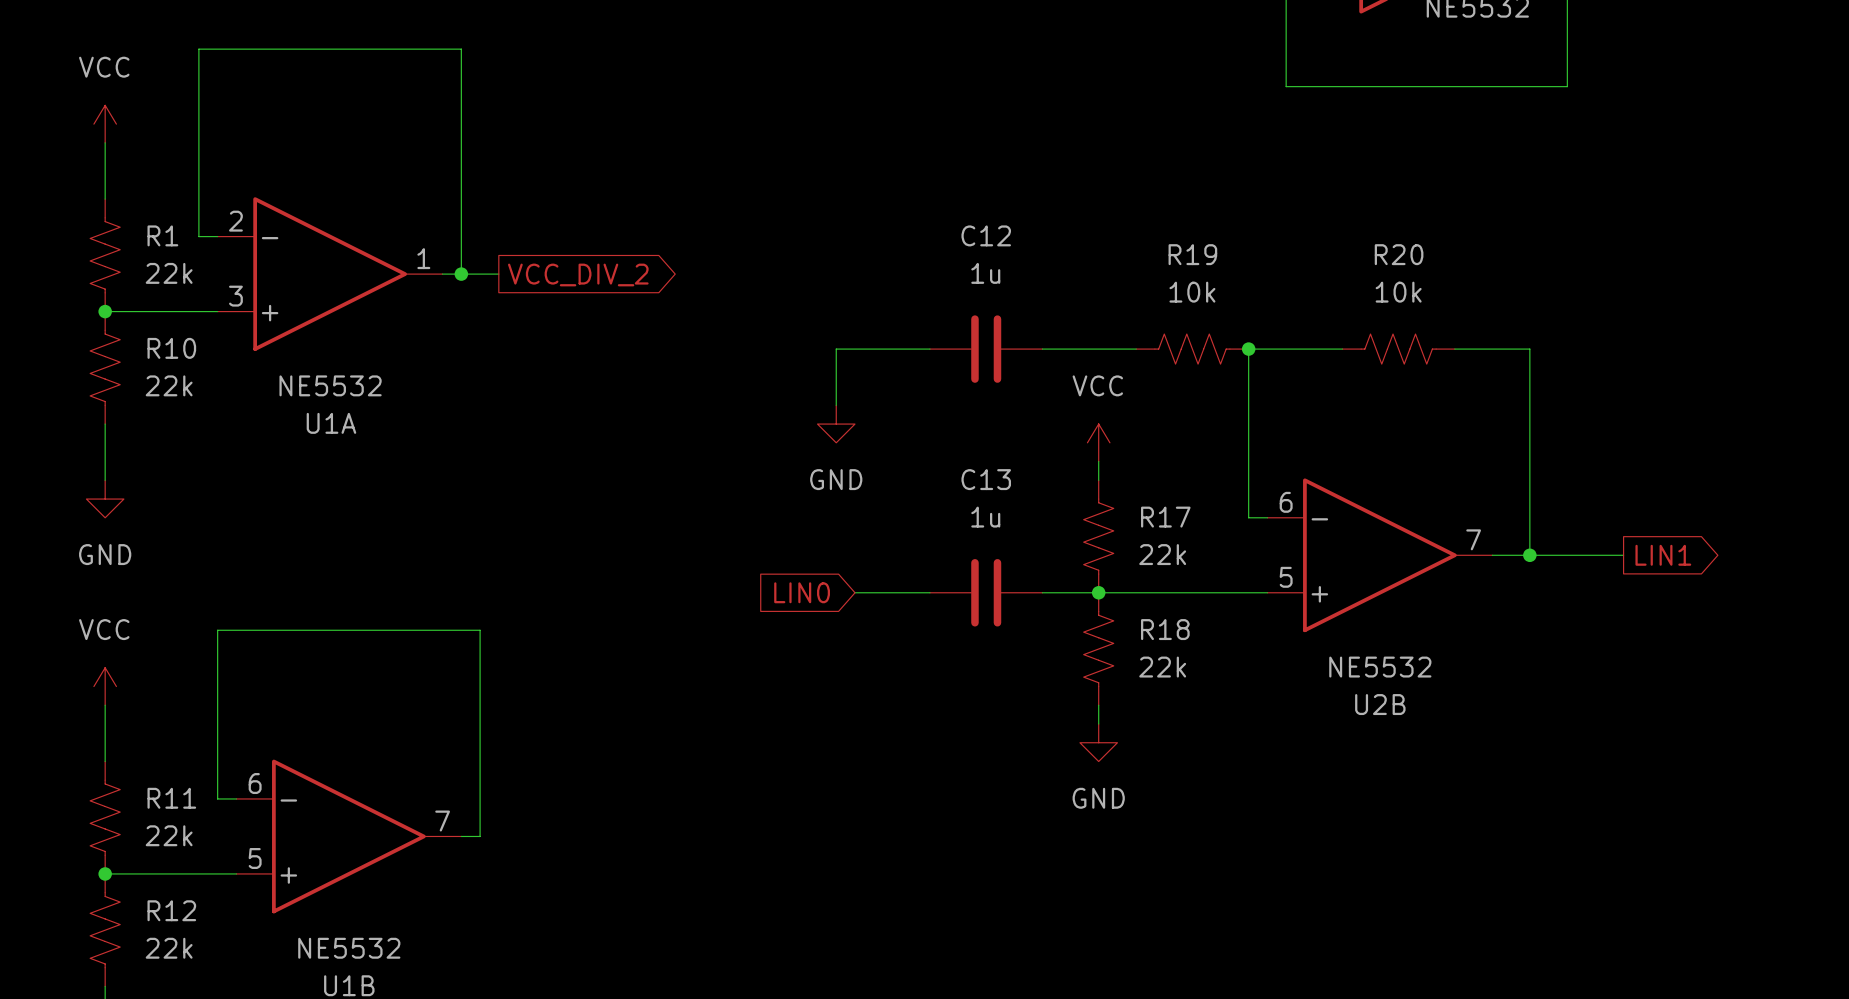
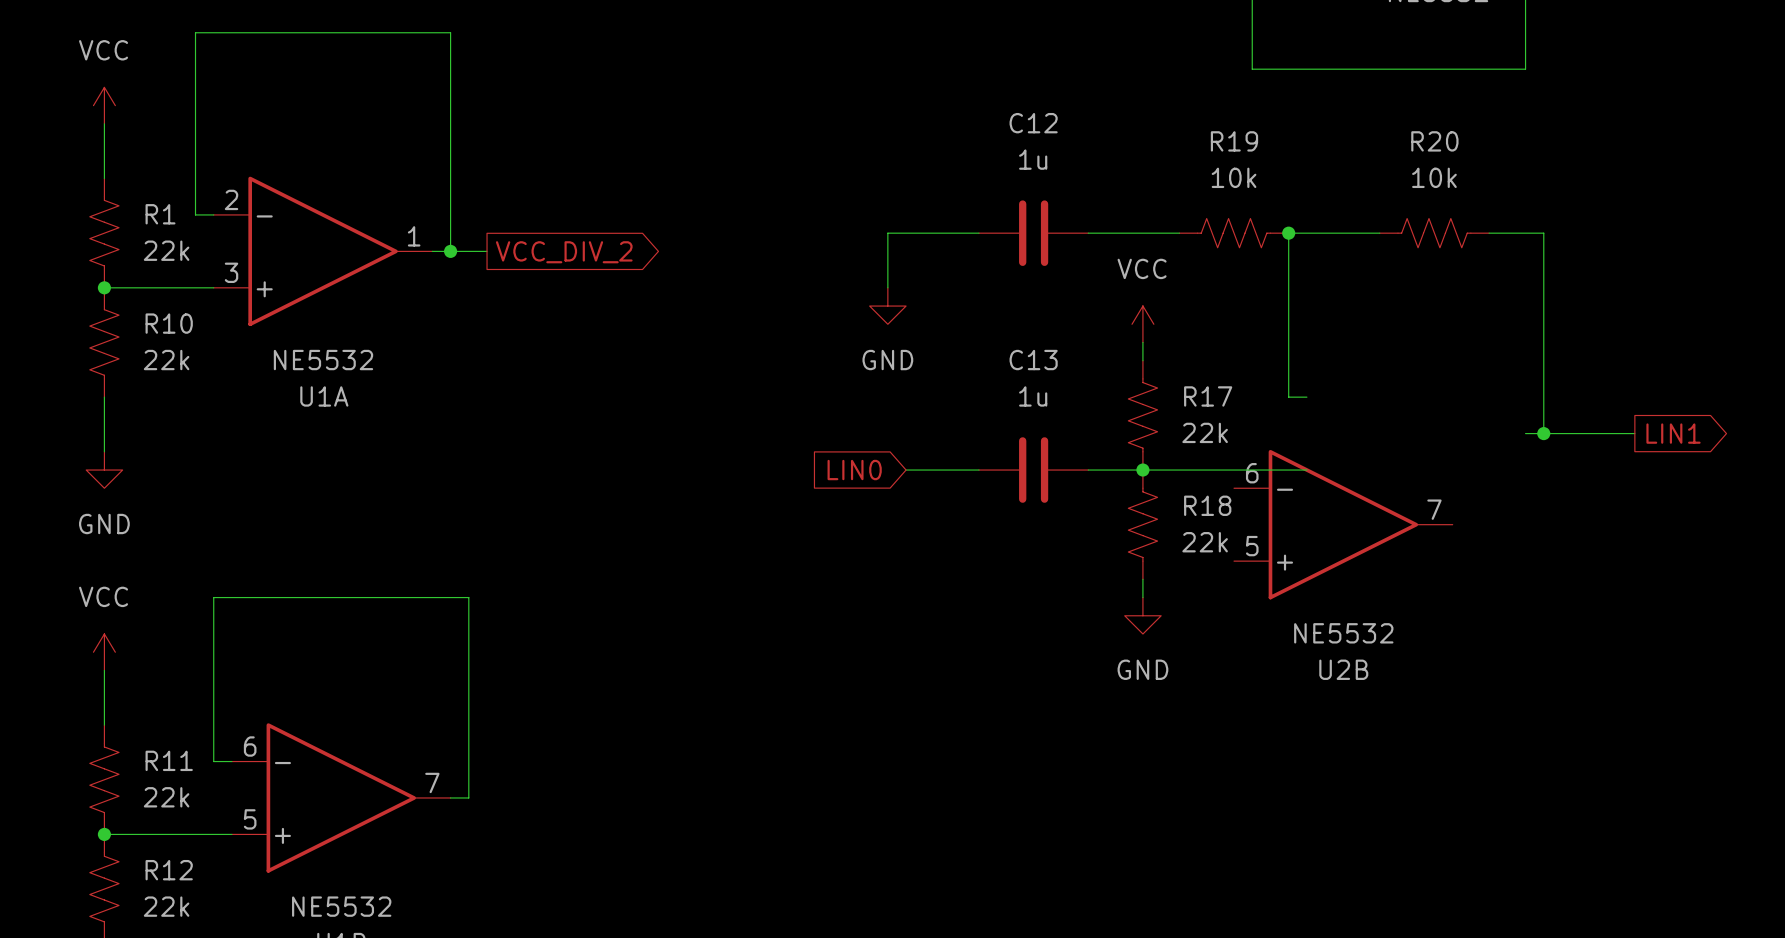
junction: none -> (1288, 233)
wire: none -> (1489, 233) (1543, 233) (1543, 433)
wire: (929, 349) (836, 349) (836, 405) -> (978, 233) (887, 233) (887, 287)
C12 position: (986, 349) -> (1033, 233)
wire: (1042, 349) (1136, 349) -> (1088, 233) (1179, 233)
R19 position: (1192, 349) -> (1234, 233)
junction: (1248, 349) -> none
wire: (1342, 349) (1248, 349) (1248, 517) (1267, 517) -> (1379, 233) (1288, 233) (1288, 397) (1306, 397)
R20 position: (1398, 349) -> (1434, 233)
wire: (1454, 349) (1529, 349) (1529, 555) -> none
power symbol position: GND (836, 424) -> GND (887, 306)
power symbol position: VCC (1098, 442) -> VCC (1142, 324)
wire: (1098, 461) (1098, 480) -> (1142, 342) (1142, 360)
wire: none -> (1525, 433) (1634, 433)
junction: none -> (1543, 433)
junction: none -> (1142, 470)
R17 position: (1098, 536) -> (1142, 415)
wire: (1492, 555) (1623, 555) -> none
junction: (1529, 555) -> none
global label position: LIN1 (1663, 555) -> LIN1 (1673, 433)
global label position: LIN0 (802, 592) -> LIN0 (854, 470)
wire: (855, 592) (929, 592) -> (906, 470) (978, 470)
C13 position: (986, 592) -> (1033, 470)
wire: (1042, 592) (1267, 592) -> (1088, 470) (1306, 470)
junction: (1098, 592) -> none
R18 position: (1098, 649) -> (1142, 524)
wire: (1098, 705) (1098, 724) -> (1142, 579) (1142, 597)
power symbol position: GND (1098, 742) -> GND (1142, 615)

